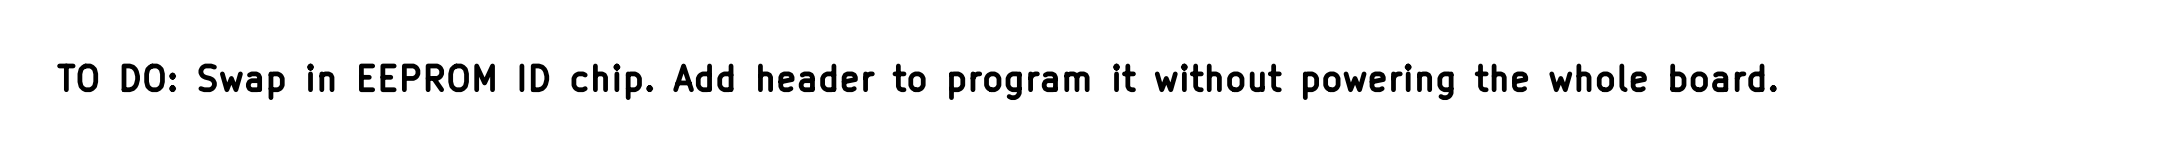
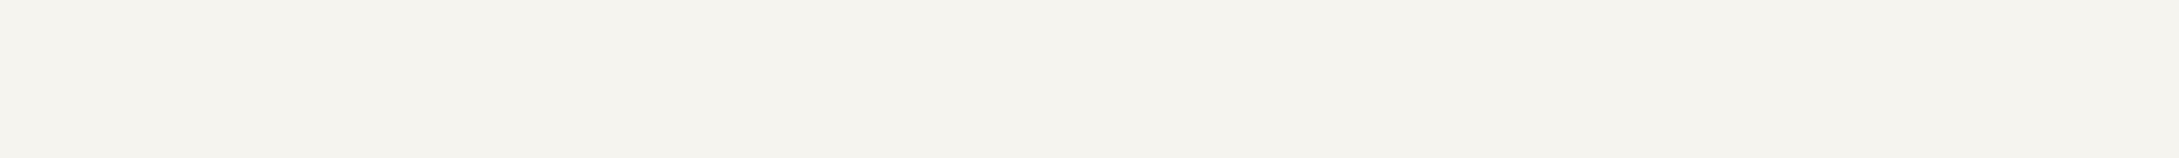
text: TO DO: Swap in EEPROM ID chip. Add header to program it without powering the whole board. (917, 81) -> none

